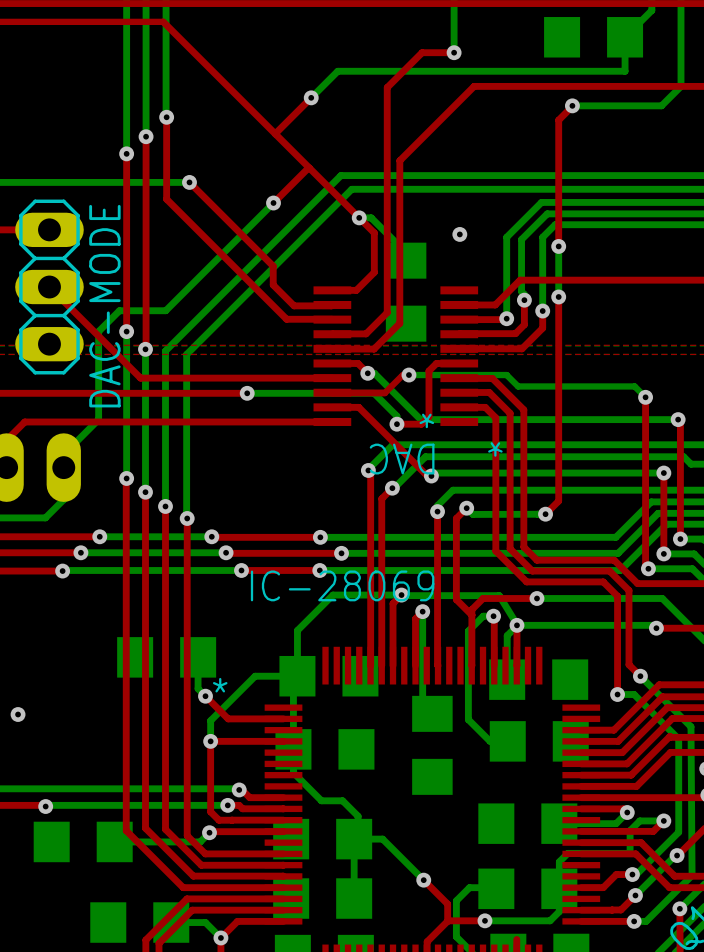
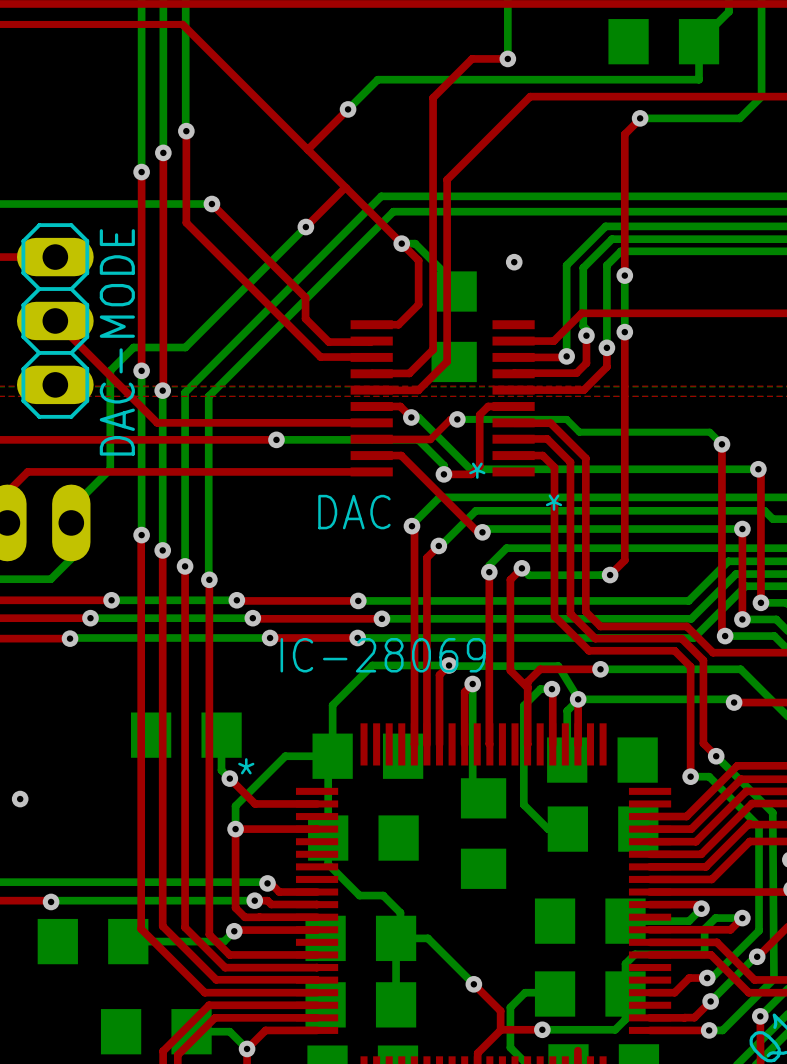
DAC name rotation: 0° (402, 459) -> 180° (354, 512)

